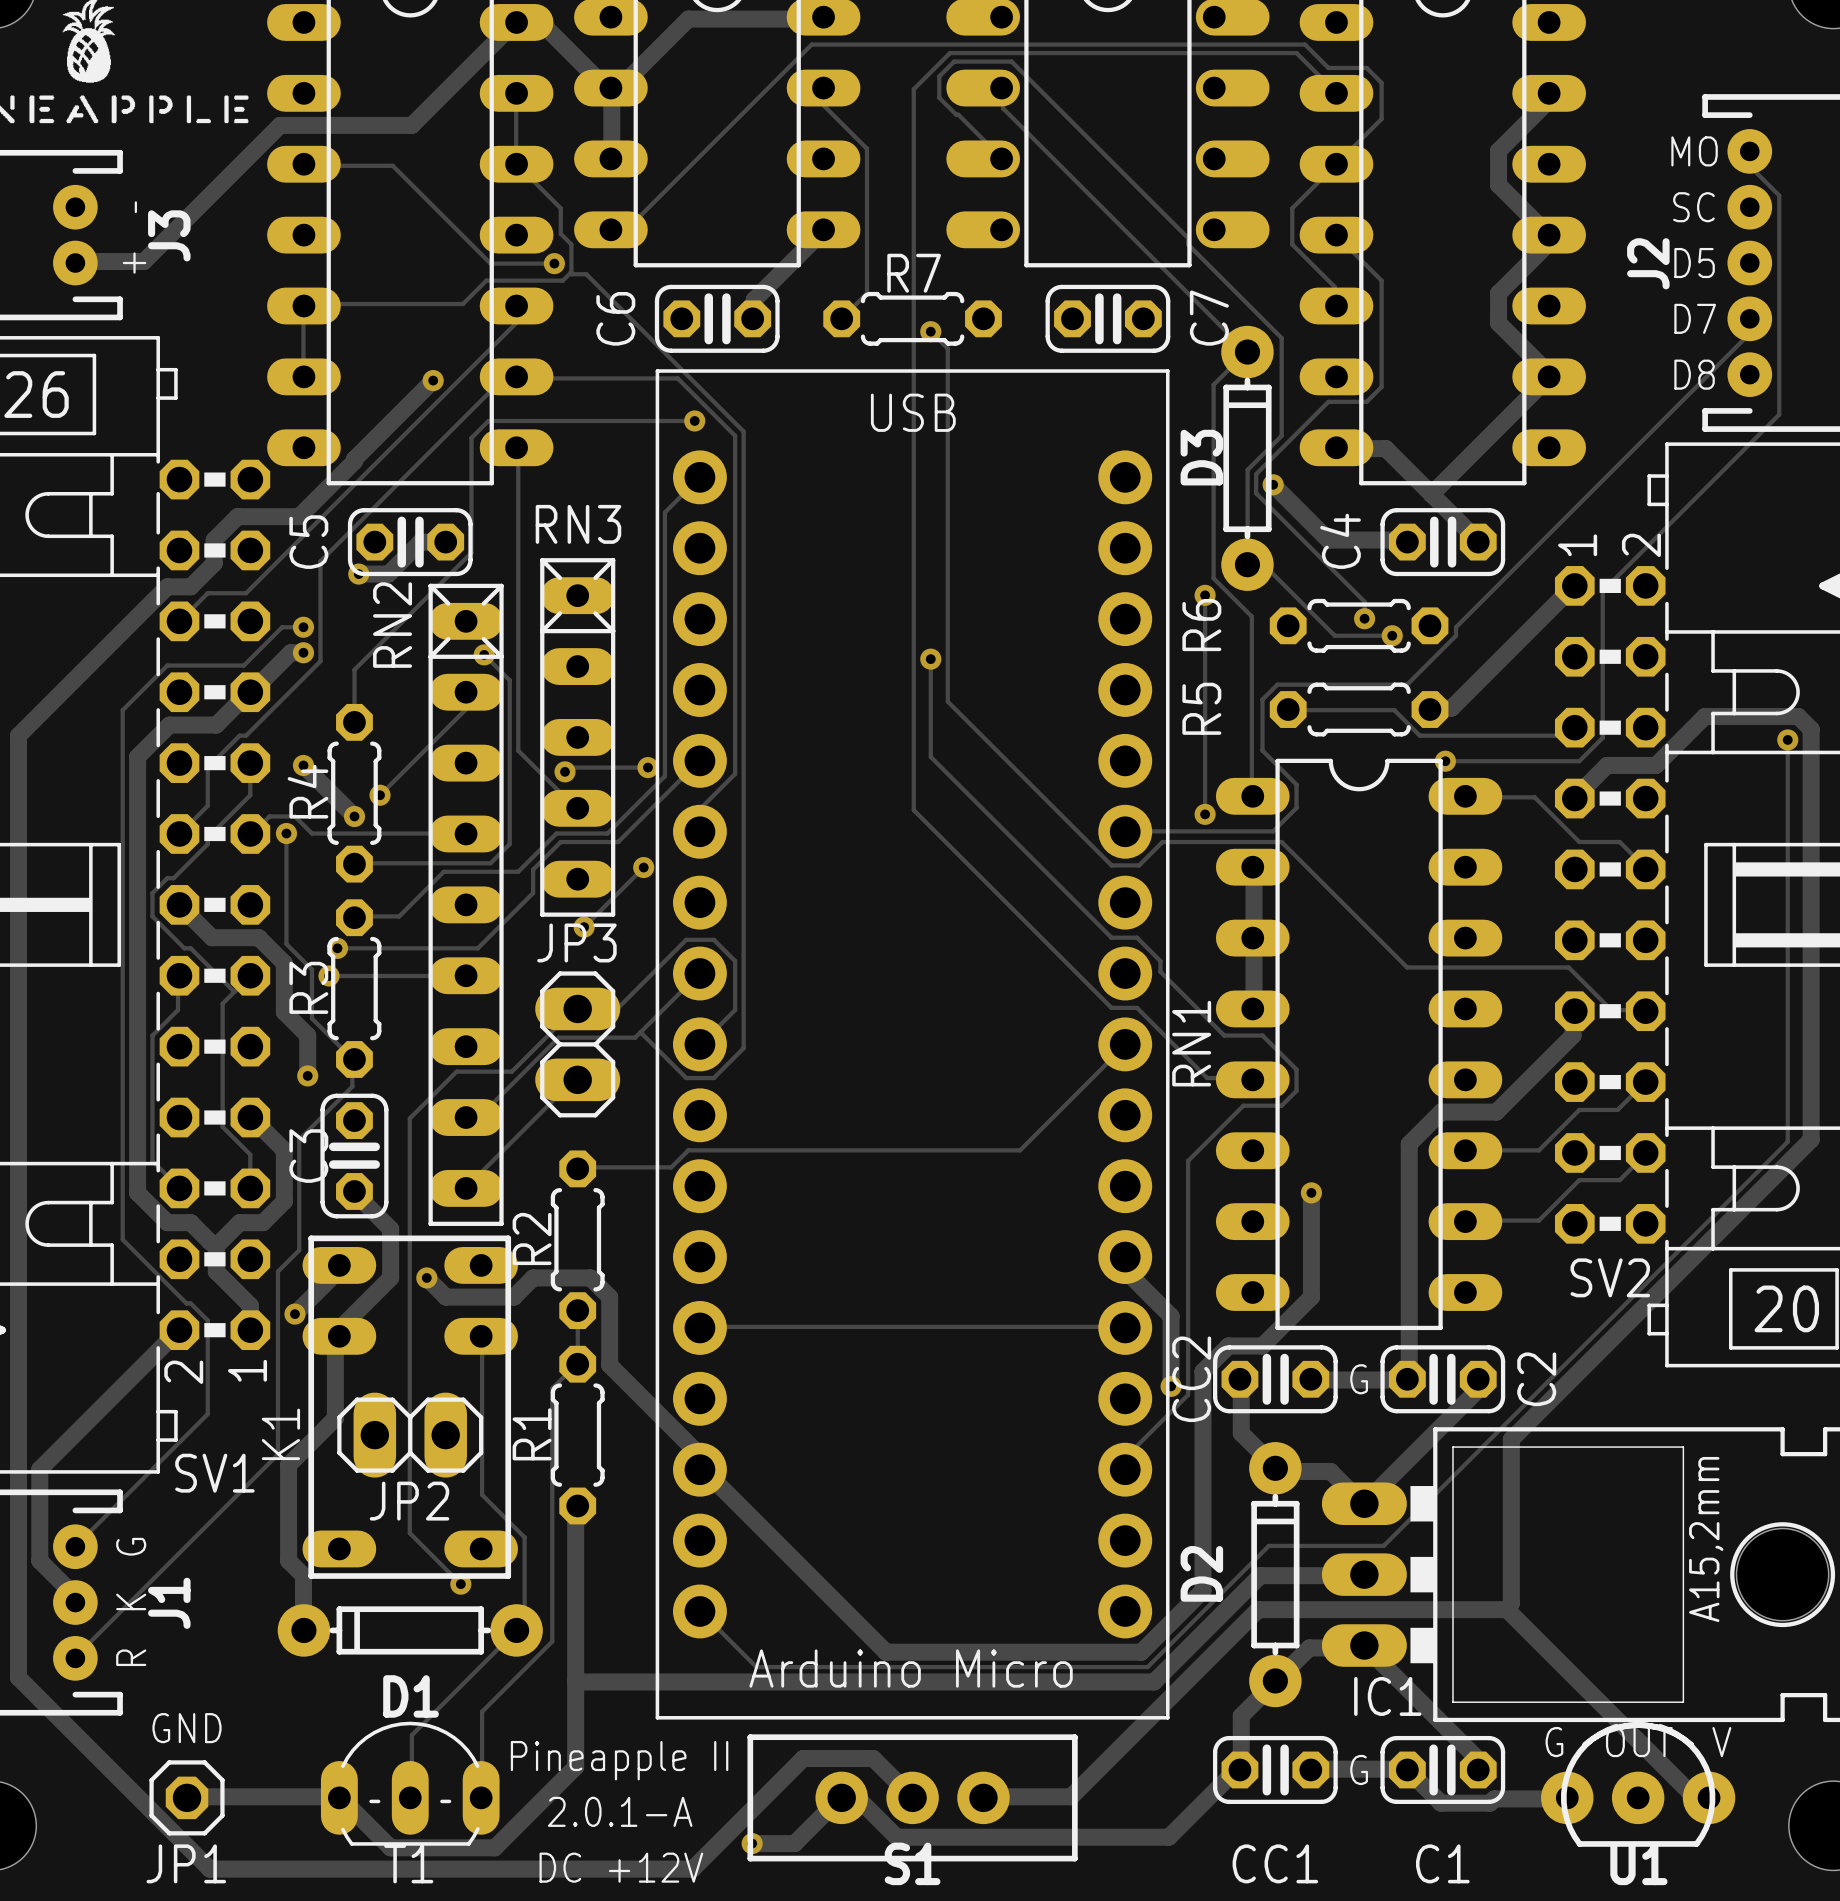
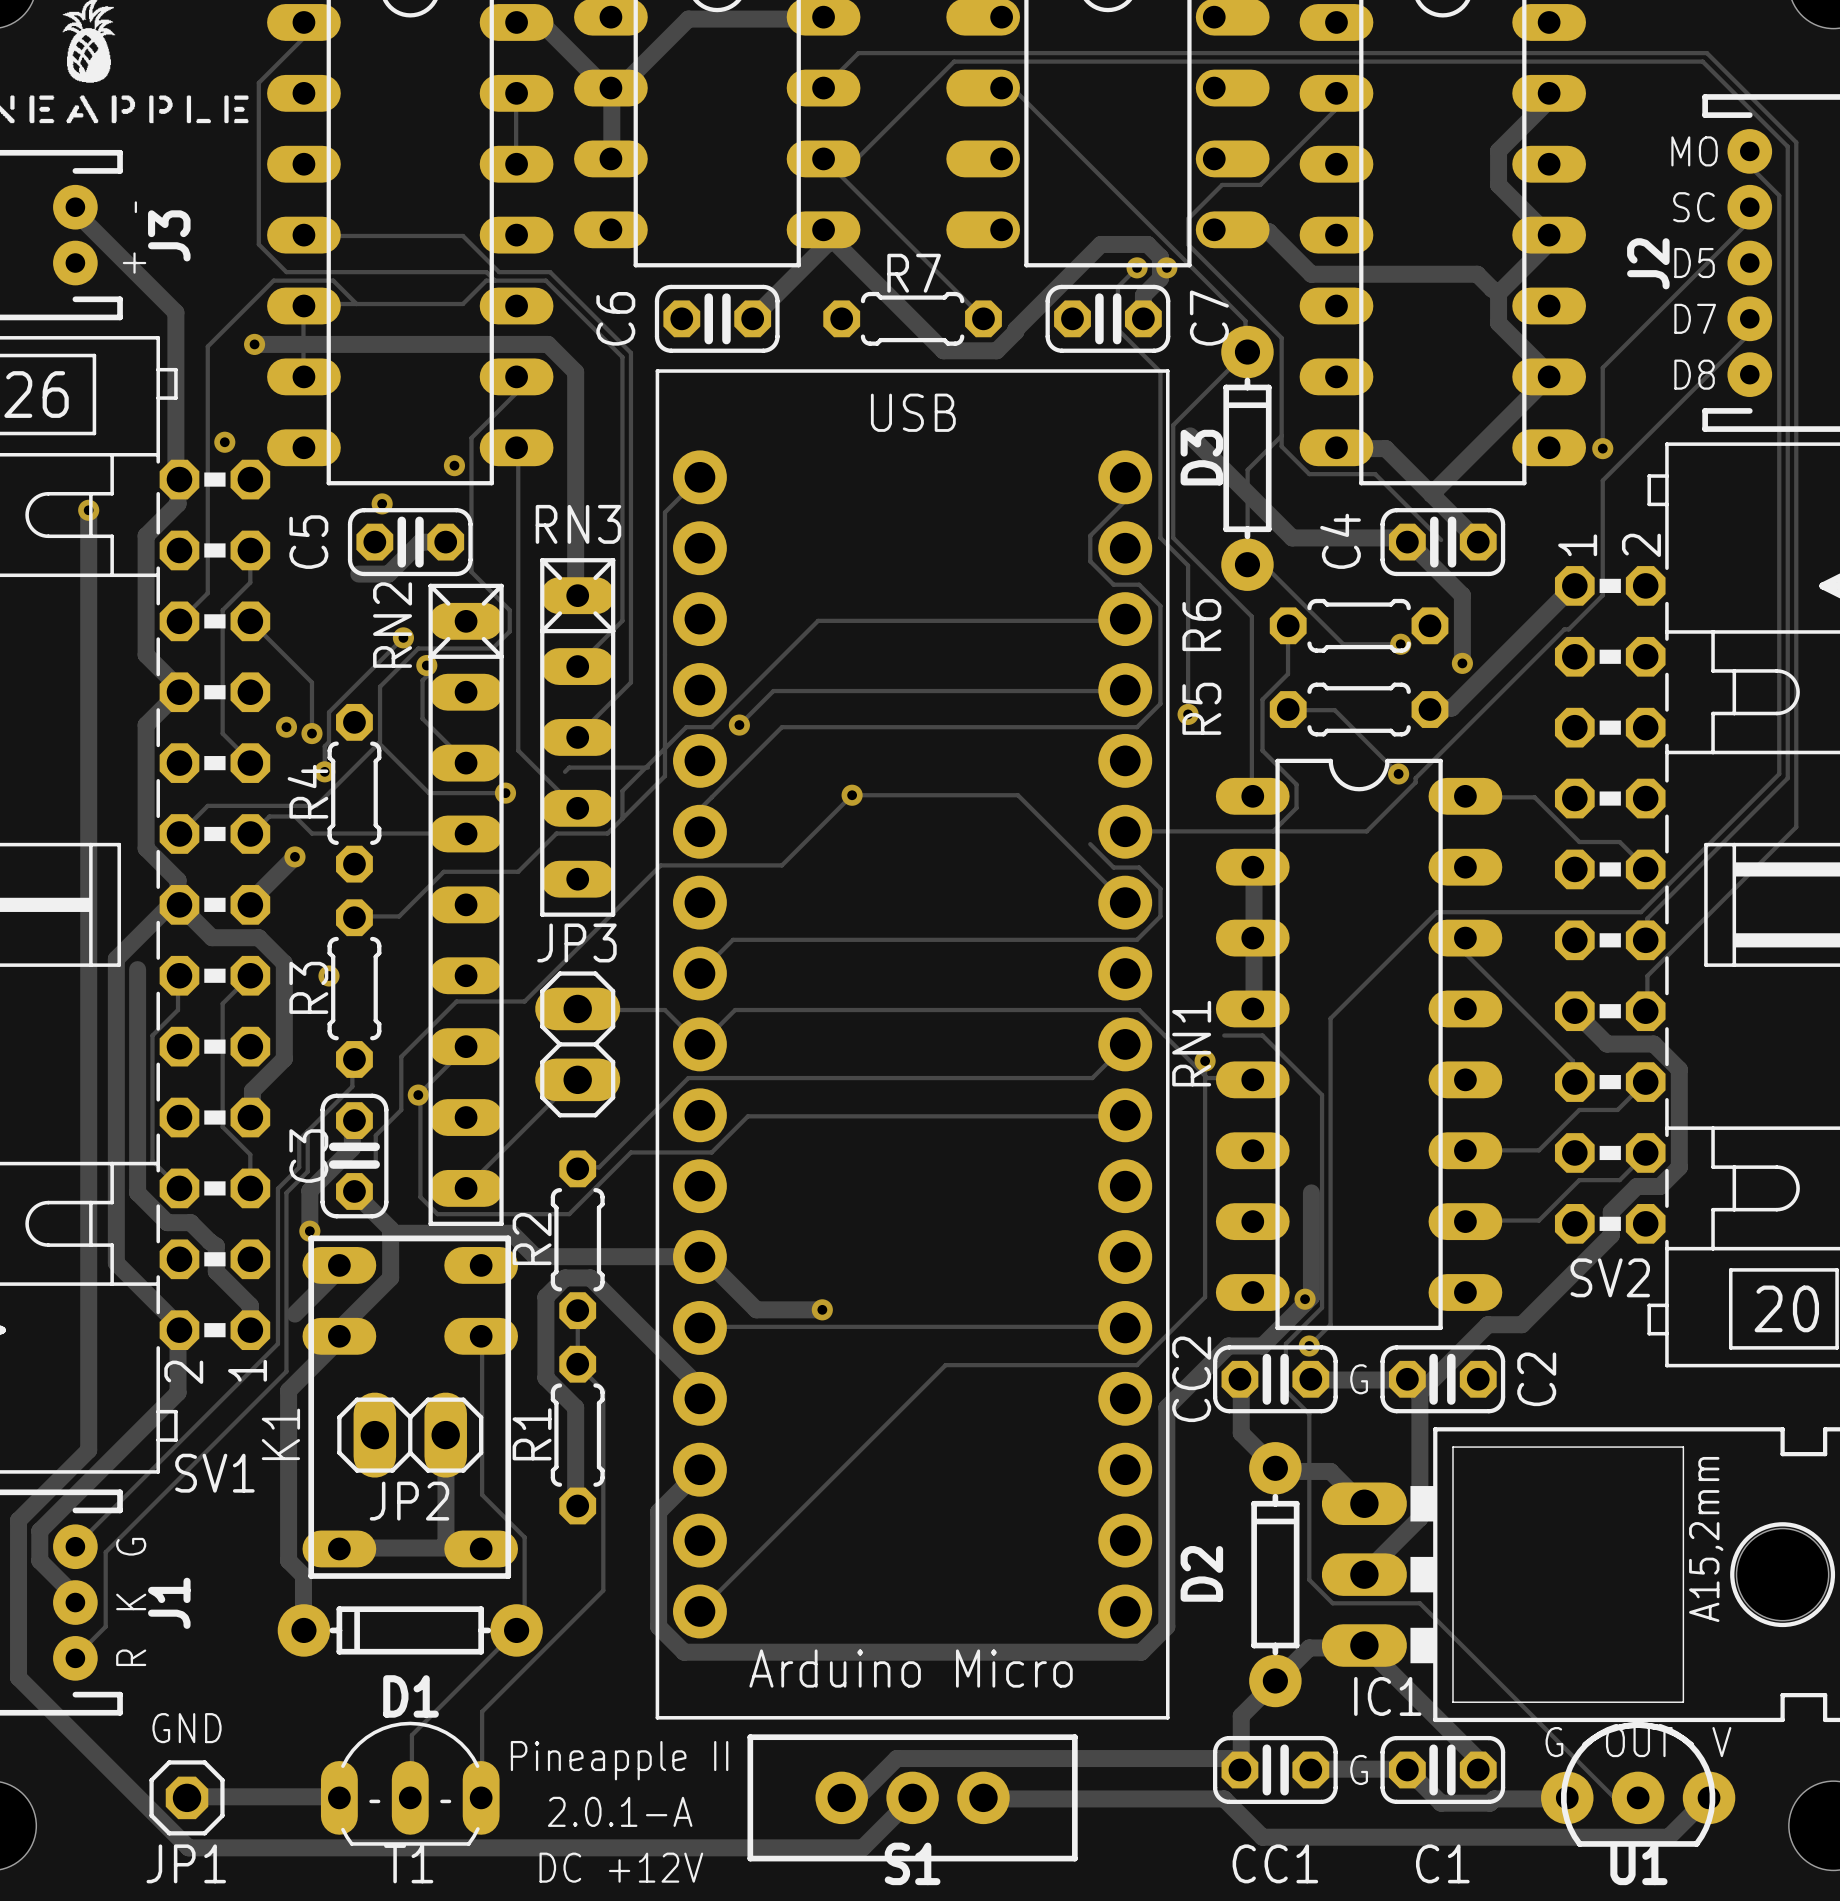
track: none -> (303, 22) (303, 38) (258, 82) (258, 244) (286, 272) (486, 272) (494, 280)
track: (516, 22) (411, 125) (280, 125) (143, 261) (75, 261) (75, 263) -> none
track: (949, 53) (913, 89) (913, 810) (1111, 1007) (1137, 1007) (1139, 1010) -> none
track: (1296, 53) (1336, 93) -> (1188, 238) (1188, 218) (1222, 184) (1260, 184) (1334, 110) (1334, 93) (1336, 93)
track: (1011, 61) (1188, 238) -> (1011, 61) (1702, 61) (1787, 146) (1787, 739)
track: (939, 76) (939, 97) (1001, 158) -> (939, 76) (841, 174) (823, 158) (983, 318)
track: (823, 88) (824, 106) (866, 148) (866, 293) (841, 318) -> (823, 88) (858, 53) (949, 53)
track: (1003, 89) (1003, 108) (1245, 350) -> (1003, 89) (1013, 89) (1245, 321) (1245, 350)
track: (303, 164) (305, 165) (392, 165) (462, 235) -> (303, 235) (462, 235)
track: (516, 164) (560, 208) (560, 233) (571, 244) (571, 272) (562, 280) (545, 280) -> (577, 666) (622, 620) (622, 357) (545, 280)
track: none -> (75, 207) (75, 212) (175, 312) (175, 472) (179, 479) (178, 503) (146, 535) (146, 654) (175, 684) (179, 692) (146, 725) (146, 848) (178, 880) (179, 904) (167, 907) (116, 958) (116, 1263) (175, 1322) (179, 1330)
track: none -> (1749, 207) (1749, 221) (1602, 367) (1602, 448)
track: (610, 229) (626, 229) (811, 44) (1305, 44) (1328, 67) (1366, 67) (1381, 82) (1381, 119) (1292, 208) (1292, 244) (1334, 287) (1336, 306) -> none
track: (823, 229) (754, 299) (754, 316) -> (1143, 318) (1143, 295) (1160, 278) (1160, 257) (1147, 244) (1100, 244) (996, 350) (943, 350) (823, 229) (826, 244) (754, 316)
track: none -> (1214, 229) (1215, 231) (1268, 231) (1311, 274) (1477, 274) (1498, 293)
track: (1336, 235) (1381, 280) (1381, 386) (1366, 401) (1328, 401) (1256, 474) (1256, 493) (1364, 601) (1364, 618) -> none
track: (490, 263) (554, 263) -> (490, 263) (499, 272) (550, 272) (630, 352) (630, 682) (577, 737)
via: (554, 263) -> none
track: none -> (1137, 267) (1117, 287) (1117, 329) (1160, 372) (1160, 537) (1188, 565) (1188, 714)
via: none -> (1137, 267)
via: none -> (1166, 267)
track: (570, 273) (586, 274) (743, 431) (743, 1048) (713, 1078) -> none
track: (516, 306) (516, 323) (246, 593) (207, 593) -> (356, 304) (333, 280) (273, 280) (207, 346) (207, 593)
track: (930, 331) (947, 348) (947, 701) (1090, 844) -> none
via: (930, 331) -> none
track: none -> (254, 344) (548, 344) (575, 372) (575, 595) (577, 595)
via: none -> (254, 344)
track: (516, 376) (518, 378) (677, 378) (735, 435) (735, 773) -> (1125, 477) (1124, 501) (1090, 535) (1090, 561) (1113, 584) (1139, 584) (1160, 605) (1160, 703) (1137, 727) (781, 727) (735, 773)
track: (516, 378) (503, 378) (320, 561) (320, 661) (246, 735) (239, 735) (207, 767) (207, 805) -> none
track: (433, 380) (299, 516) (237, 516) (214, 540) (214, 563) (190, 586) (167, 586) (18, 735) (18, 1520) -> (88, 510) (88, 1450) (18, 1520)
via: (433, 380) -> none
track: (1213, 384) (1213, 578) -> (1213, 384) (1173, 425) (1173, 537) (1213, 578)
track: (1779, 414) (1602, 591) -> (1602, 480) (1602, 591)
track: none -> (1779, 414) (1779, 773) (1641, 912) (1436, 912) (1330, 1018) (1330, 1324) (1309, 1345)
track: (488, 420) (694, 420) -> (488, 420) (516, 393) (516, 378)
via: (694, 420) -> none
track: none -> (1190, 435) (1292, 537) (1400, 537) (1409, 542) (1462, 595) (1462, 663)
track: none -> (1281, 435) (1281, 446) (1309, 474) (1375, 474) (1441, 540)
via: none -> (224, 442)
via: none -> (1602, 448)
via: none -> (454, 465)
track: (1602, 480) (1456, 627) (1456, 635) (1407, 684) (1277, 684) -> (1288, 625) (1288, 674) (1277, 684)
track: (1273, 484) (1328, 540) (1407, 540) (1407, 542) -> none
via: (1273, 484) -> none
via: none -> (382, 503)
via: none -> (88, 510)
track: (471, 552) (354, 669) (354, 722) -> (471, 552) (471, 571) (509, 610) (509, 631) (492, 648) (418, 648) (380, 686) (380, 742) (316, 805) (207, 805)
via: (358, 574) -> none
track: (1205, 595) (1205, 814) -> none
via: (1205, 595) -> none
track: (1602, 595) (1602, 737) (1579, 761) (1445, 761) -> (1602, 595) (1568, 629) (1564, 629) (1415, 778) (1415, 782) (1366, 831) (1273, 831)
via: (1364, 618) -> none
track: none -> (1125, 619) (1124, 620) (818, 620) (711, 727) (686, 727) (622, 790) (622, 818)
track: none -> (250, 621) (311, 682) (311, 733)
track: (303, 627) (282, 627) (243, 665) (167, 665) (122, 710) (122, 1239) (186, 1303) (190, 1303) (207, 1320) (207, 1414) -> (277, 1343) (207, 1414)
via: (303, 627) -> none
track: (1334, 635) (1392, 635) -> (1334, 635) (1343, 644) (1400, 644)
via position: (1392, 635) -> (1400, 644)
track: none -> (403, 637) (328, 712) (328, 742) (324, 746) (324, 771)
via: none -> (403, 637)
track: (303, 652) (290, 652) (216, 725) (169, 725) (137, 756) (137, 969) -> none
via: (303, 652) -> none
track: (484, 654) (509, 680) (509, 844) (490, 863) (354, 864) -> none
via: (484, 654) -> none
track: (930, 659) (930, 756) (1111, 937) (1137, 937) (1160, 961) (1160, 971) (1224, 1035) -> none
via: (930, 659) -> none
via: none -> (1462, 663)
track: none -> (426, 665) (426, 676) (422, 680) (422, 718) (466, 763)
via: none -> (426, 665)
track: none -> (1125, 689) (773, 691) (739, 725)
track: (466, 692) (465, 710) (380, 795) -> none
track: (1334, 710) (1394, 710) (1419, 735) (1566, 735) (1574, 727) -> (1334, 710) (1398, 773)
via: none -> (1188, 714)
via: none -> (739, 725)
via: none -> (286, 727)
via: none -> (311, 733)
via: (1787, 739) -> none
track: none -> (378, 743) (428, 793) (505, 793)
track: (699, 760) (618, 842) (560, 842) (533, 869) (533, 893) (477, 948) (337, 948) -> none
via position: (1445, 761) -> (1398, 773)
track: (250, 763) (250, 795) (207, 837) (207, 844) (173, 878) (167, 878) (152, 893) (152, 916) (184, 948) (190, 948) (234, 991) -> (250, 763) (222, 733) (222, 610) (250, 582) (250, 550)
track: (303, 765) (354, 816) -> none
via: (303, 765) -> none
via: (647, 767) -> none
via: none -> (324, 771)
via: (565, 771) -> none
track: (1787, 778) (1787, 1141) (1383, 1545) (1268, 1545) (1147, 1667) (756, 1667) (699, 1611) -> (1205, 1061) (1205, 1297) (1137, 1365) (945, 1365) (699, 1611)
track: none -> (1787, 778) (1647, 918) (1647, 939) (1645, 940)
via: none -> (505, 793)
via: (380, 795) -> none
via: none -> (852, 795)
track: (1574, 798) (1607, 765) (1655, 765) (1704, 716) (1798, 716) (1811, 729) (1811, 1139) (1511, 1439) (1511, 1603) (1507, 1609) -> none
via: (1205, 814) -> none
via: (354, 816) -> none
track: (286, 833) (286, 944) (311, 969) (311, 1018) (354, 1059) -> none
via position: (286, 833) -> (294, 856)
track: none -> (294, 856) (254, 897) (250, 904)
track: (1111, 865) (1139, 865) (1162, 842) (1281, 842) (1407, 967) (1568, 967) (1611, 1010) (1645, 1011) -> (1296, 53) (1706, 53) (1796, 142) (1796, 827) (1647, 975) (1647, 1010) (1645, 1011)
track: (643, 867) (584, 927) -> none
via: (643, 867) -> none
track: none -> (1125, 902) (1017, 795) (852, 795) (781, 865) (660, 865) (524, 1001) (456, 1001) (401, 1056) (401, 1109) (375, 1135) (375, 1160)
via: (584, 927) -> none
track: none -> (1465, 938) (1466, 954) (1572, 1061) (1572, 1080) (1574, 1082)
via: (337, 948) -> none
track: (699, 973) (635, 1037) (558, 1037) (479, 1116) (466, 1117) -> (699, 973) (733, 939) (1137, 939) (1160, 916) (1160, 888) (1139, 867) (1113, 867) (1111, 865)
track: (466, 975) (328, 975) -> none
track: none -> (577, 1008) (664, 1010) (699, 1044)
track: (735, 1010) (735, 961) (713, 939) (686, 939) (618, 1007) (575, 1007) (511, 1071) (456, 1071) (409, 1118) (409, 1533) (460, 1584) -> (735, 1010) (1139, 1010)
track: (1574, 1011) (1572, 1012) (1572, 1035) (1496, 1112) (1441, 1112) (1409, 1143) (1409, 1371) (1407, 1379) -> (1574, 1011) (1607, 1044) (1653, 1044) (1679, 1069) (1679, 1167) (1660, 1186) (1636, 1186) (1611, 1212) (1611, 1235) (1521, 1324) (1487, 1324) (1424, 1388) (1407, 1379) (1419, 1394) (1419, 1518) (1364, 1574)
track: (284, 1012) (307, 1035) (307, 1075) -> (284, 1012) (284, 1058) (252, 1090) (252, 1116) (250, 1117)
track: (640, 1032) (688, 1078) -> (599, 1167) (688, 1078)
track: none -> (466, 1046) (418, 1095) (420, 1095) (420, 1197) (437, 1214) (569, 1214) (630, 1152) (711, 1152) (747, 1116) (1125, 1115)
via: none -> (1205, 1061)
track: (1296, 1069) (1296, 1090) (1281, 1105) (1243, 1105) (1188, 1160) (1188, 1394) (1126, 1456) (1125, 1469) -> (1296, 1069) (1322, 1095) (1322, 1307) (1285, 1343) (1285, 1390) (1309, 1414) (1309, 1579) (1332, 1603) (1419, 1603) (1613, 1796) (1638, 1797)
via: (307, 1075) -> none
track: (1092, 1078) (1020, 1150) (688, 1150) (671, 1167) (599, 1167) -> (1092, 1078) (713, 1078)
via: none -> (418, 1095)
track: (250, 1117) (284, 1150) (284, 1201) (263, 1222) (239, 1222) (216, 1246) -> none
track: none -> (354, 1120) (352, 1122) (352, 1148) (309, 1190) (309, 1231)
track: (299, 1167) (299, 1250) (277, 1271) -> (299, 1167) (277, 1188) (277, 1271)
via: (1311, 1192) -> none
via: none -> (309, 1231)
track: none -> (390, 1233) (511, 1233) (535, 1256) (699, 1256) (707, 1260) (756, 1309) (822, 1309)
track: (1125, 1257) (1126, 1271) (1171, 1316) (1171, 1386) -> none
track: (426, 1277) (445, 1297) (514, 1297) (533, 1277) (565, 1277) -> (577, 1505) (575, 1505) (575, 1407) (545, 1377) (545, 1297) (565, 1277)
via: (426, 1277) -> none
track: (609, 1297) (609, 1365) (699, 1454) (699, 1469) (707, 1473) (886, 1652) -> (699, 1469) (658, 1511) (658, 1626) (684, 1652) (886, 1652)
track: none -> (609, 1297) (699, 1386) (699, 1398)
via: none -> (1305, 1299)
via: none -> (822, 1309)
via: (294, 1314) -> none
track: (178, 1331) (39, 1469) (39, 1531) -> (178, 1331) (178, 1392) (39, 1531)
track: (277, 1343) (277, 1454) (105, 1626) -> (307, 1131) (307, 1171) (286, 1192) (286, 1371) (105, 1552) (105, 1626)
track: (335, 1343) (335, 1418) (288, 1465) -> (335, 1343) (288, 1390) (288, 1465)
via: none -> (1309, 1345)
track: (577, 1364) (552, 1388) (552, 1641) -> (577, 1364) (603, 1390) (603, 1590) (552, 1641)
track: (1202, 1371) (1202, 1590) (1166, 1626) -> (1202, 1371) (1166, 1407) (1166, 1626)
track: (1478, 1379) (1477, 1390) (1364, 1503) -> none
via: (1171, 1386) -> none
track: none -> (445, 1435) (445, 1541) (481, 1548) (339, 1548)
track: (577, 1505) (575, 1507) (575, 1767) (494, 1847) -> none
track: (1364, 1574) (1260, 1575) (1154, 1681) (575, 1681) -> none
via: (460, 1584) -> none
track: (1507, 1609) (1258, 1609) (1071, 1796) (983, 1797) -> (1709, 1797) (1668, 1837) (1262, 1837) (1224, 1798) (983, 1797)
track: (1507, 1609) (1694, 1796) (1709, 1797) -> none
track: (1239, 1769) (1232, 1773) (1168, 1837) (896, 1837) (858, 1798) (841, 1797) (794, 1843) (752, 1843) -> (1239, 1769) (1234, 1758) (896, 1758) (858, 1796) (841, 1797)
track: (339, 1797) (390, 1847) -> (188, 1847) (390, 1847)
track: (912, 1797) (873, 1758) (803, 1758) (692, 1869) (209, 1869) (188, 1847) -> (912, 1797) (862, 1847) (494, 1847)
via: (752, 1843) -> none

